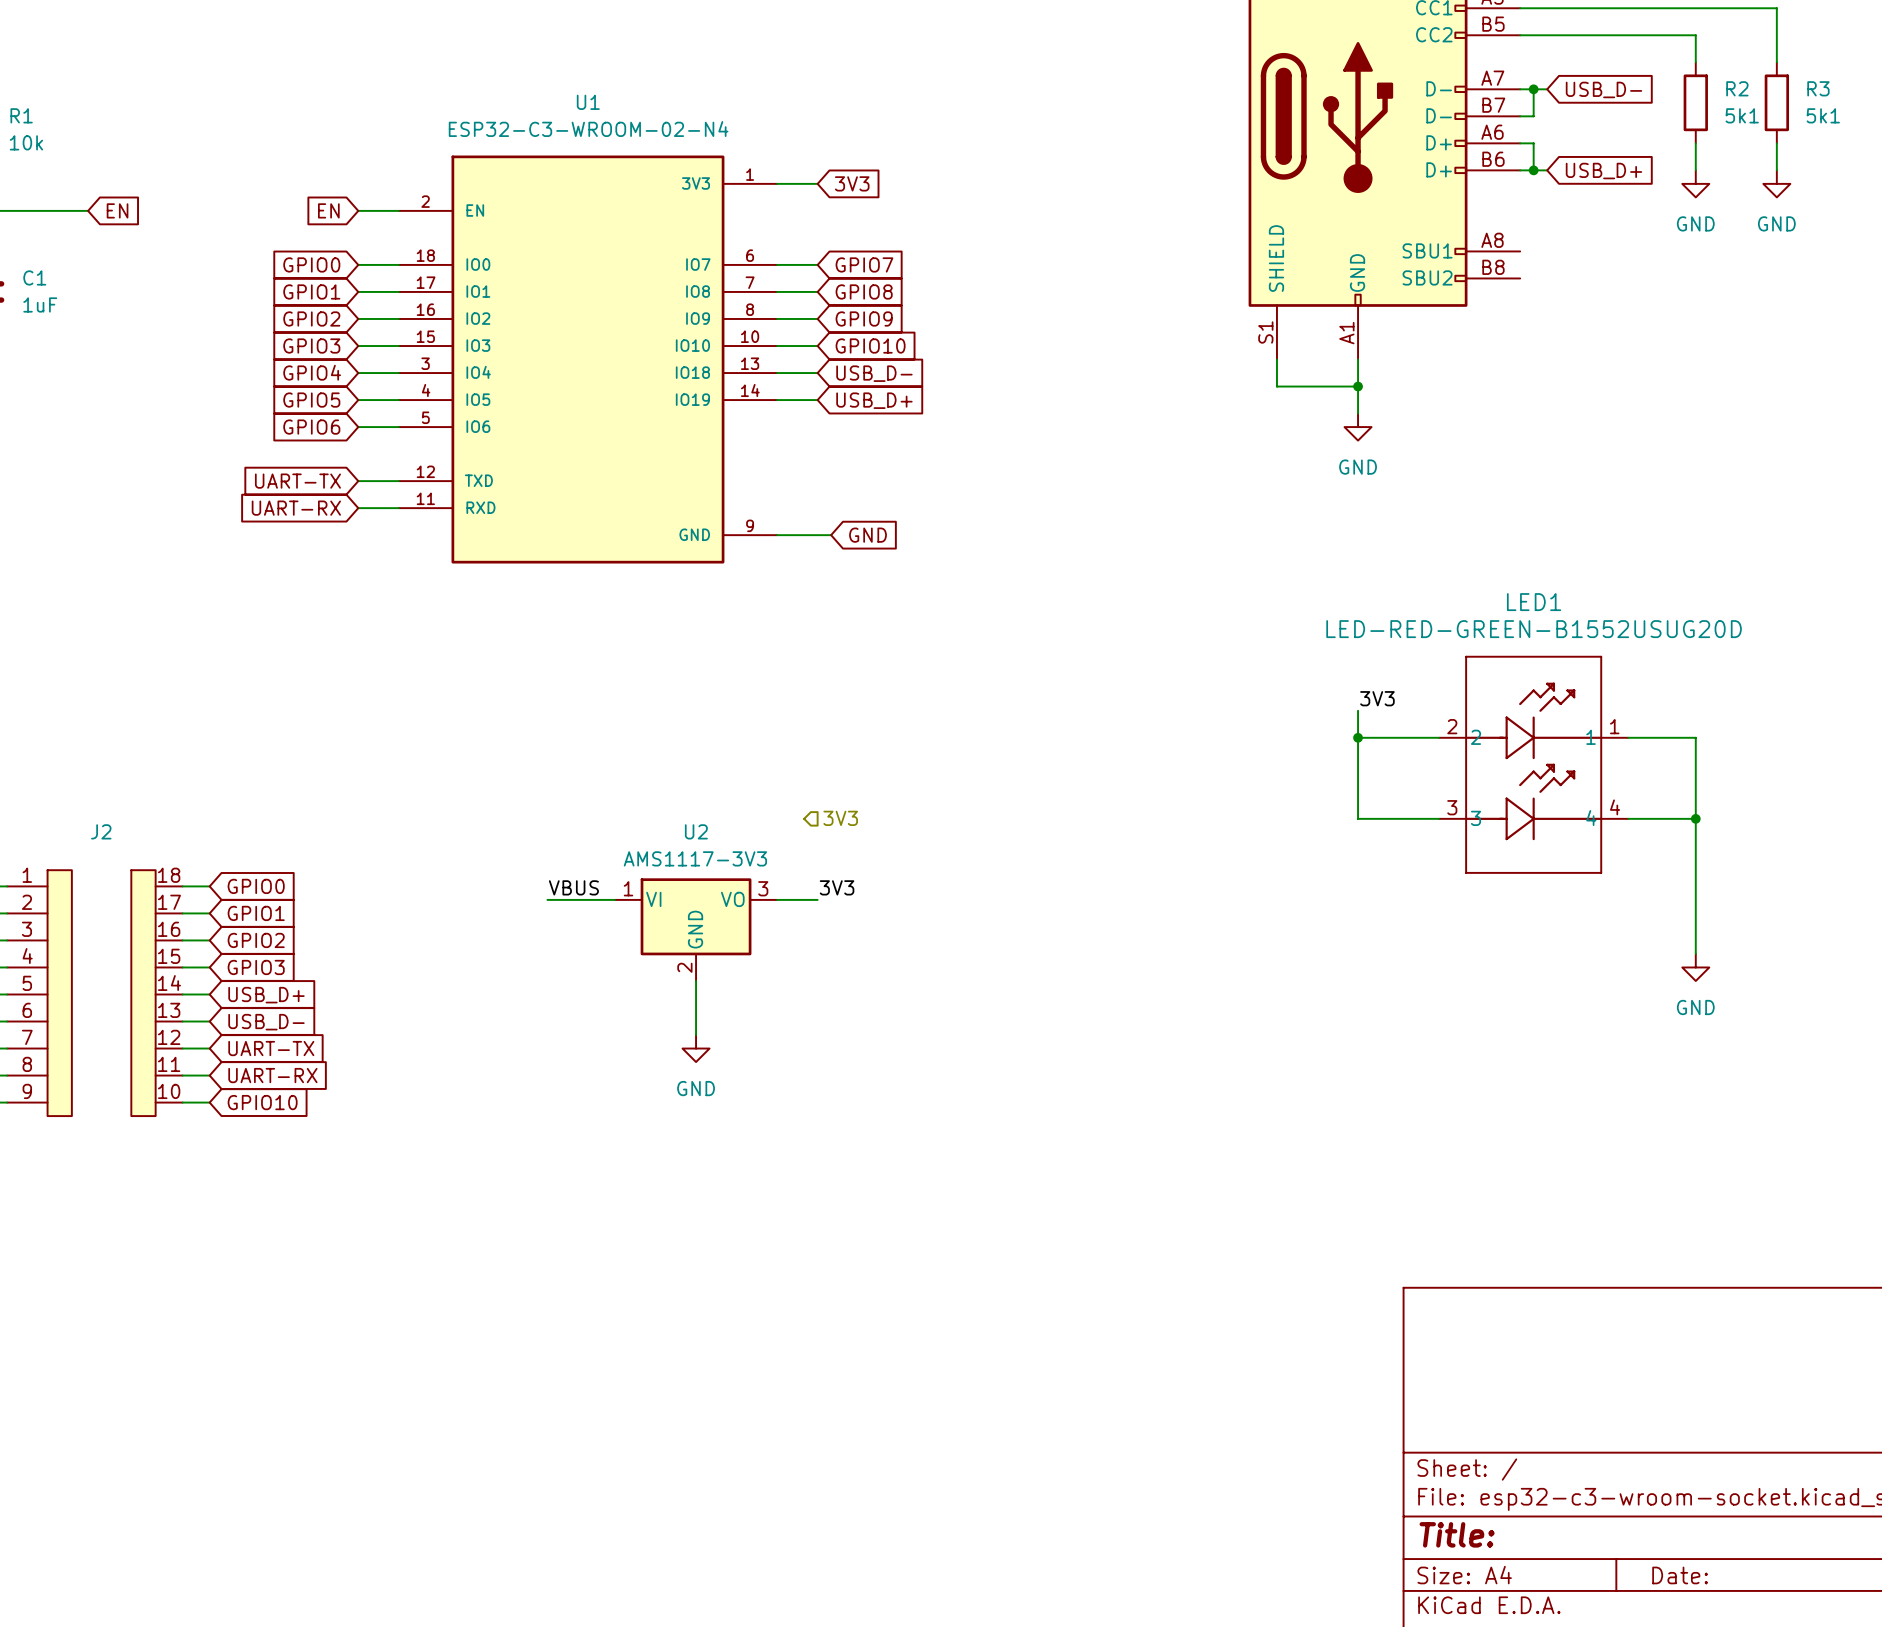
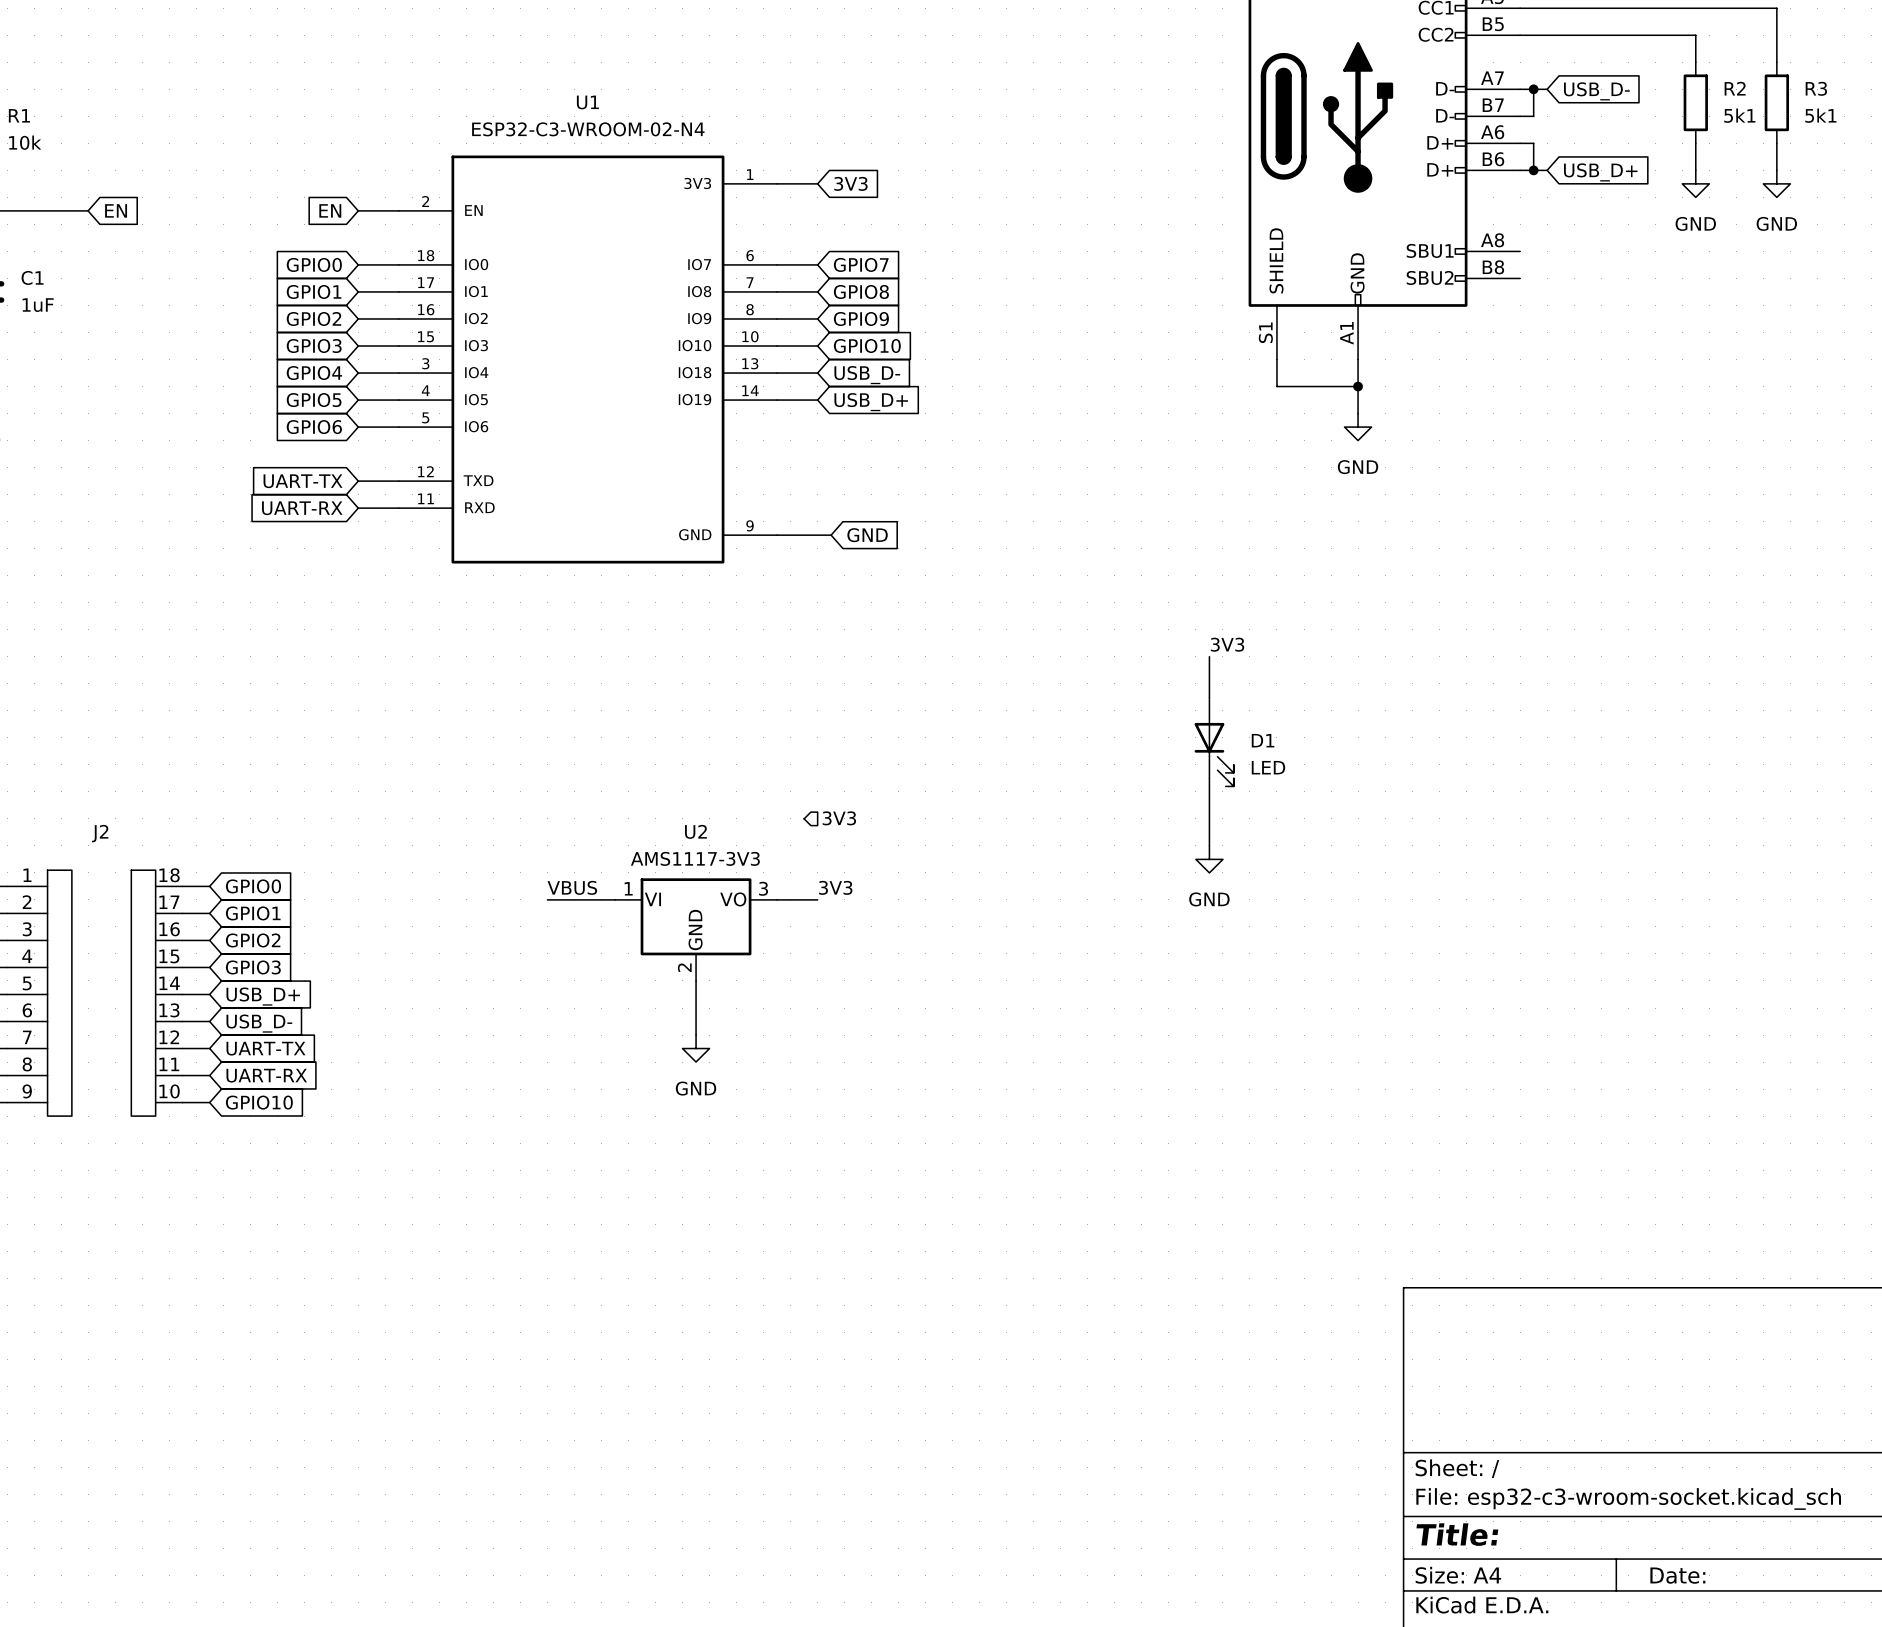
wire: none -> (1209, 656) (1209, 697)
label position: 3V3 (1377, 698) -> 3V3 (1227, 644)
wire: (1358, 710) (1358, 818) (1439, 818) -> none
wire: (1358, 737) (1439, 737) -> none
junction: (1358, 737) -> none
wire: (1628, 737) (1695, 737) (1695, 953) -> none
D1: none -> LED (1214, 741)
LED1: LED-RED-GREEN-B1552USUG20D (1533, 764) -> none
wire: none -> (1209, 778) (1209, 845)
wire: (1628, 818) (1695, 818) -> none
junction: (1695, 818) -> none
power symbol: none -> GND (1209, 859)
power symbol: GND (1695, 967) -> none

